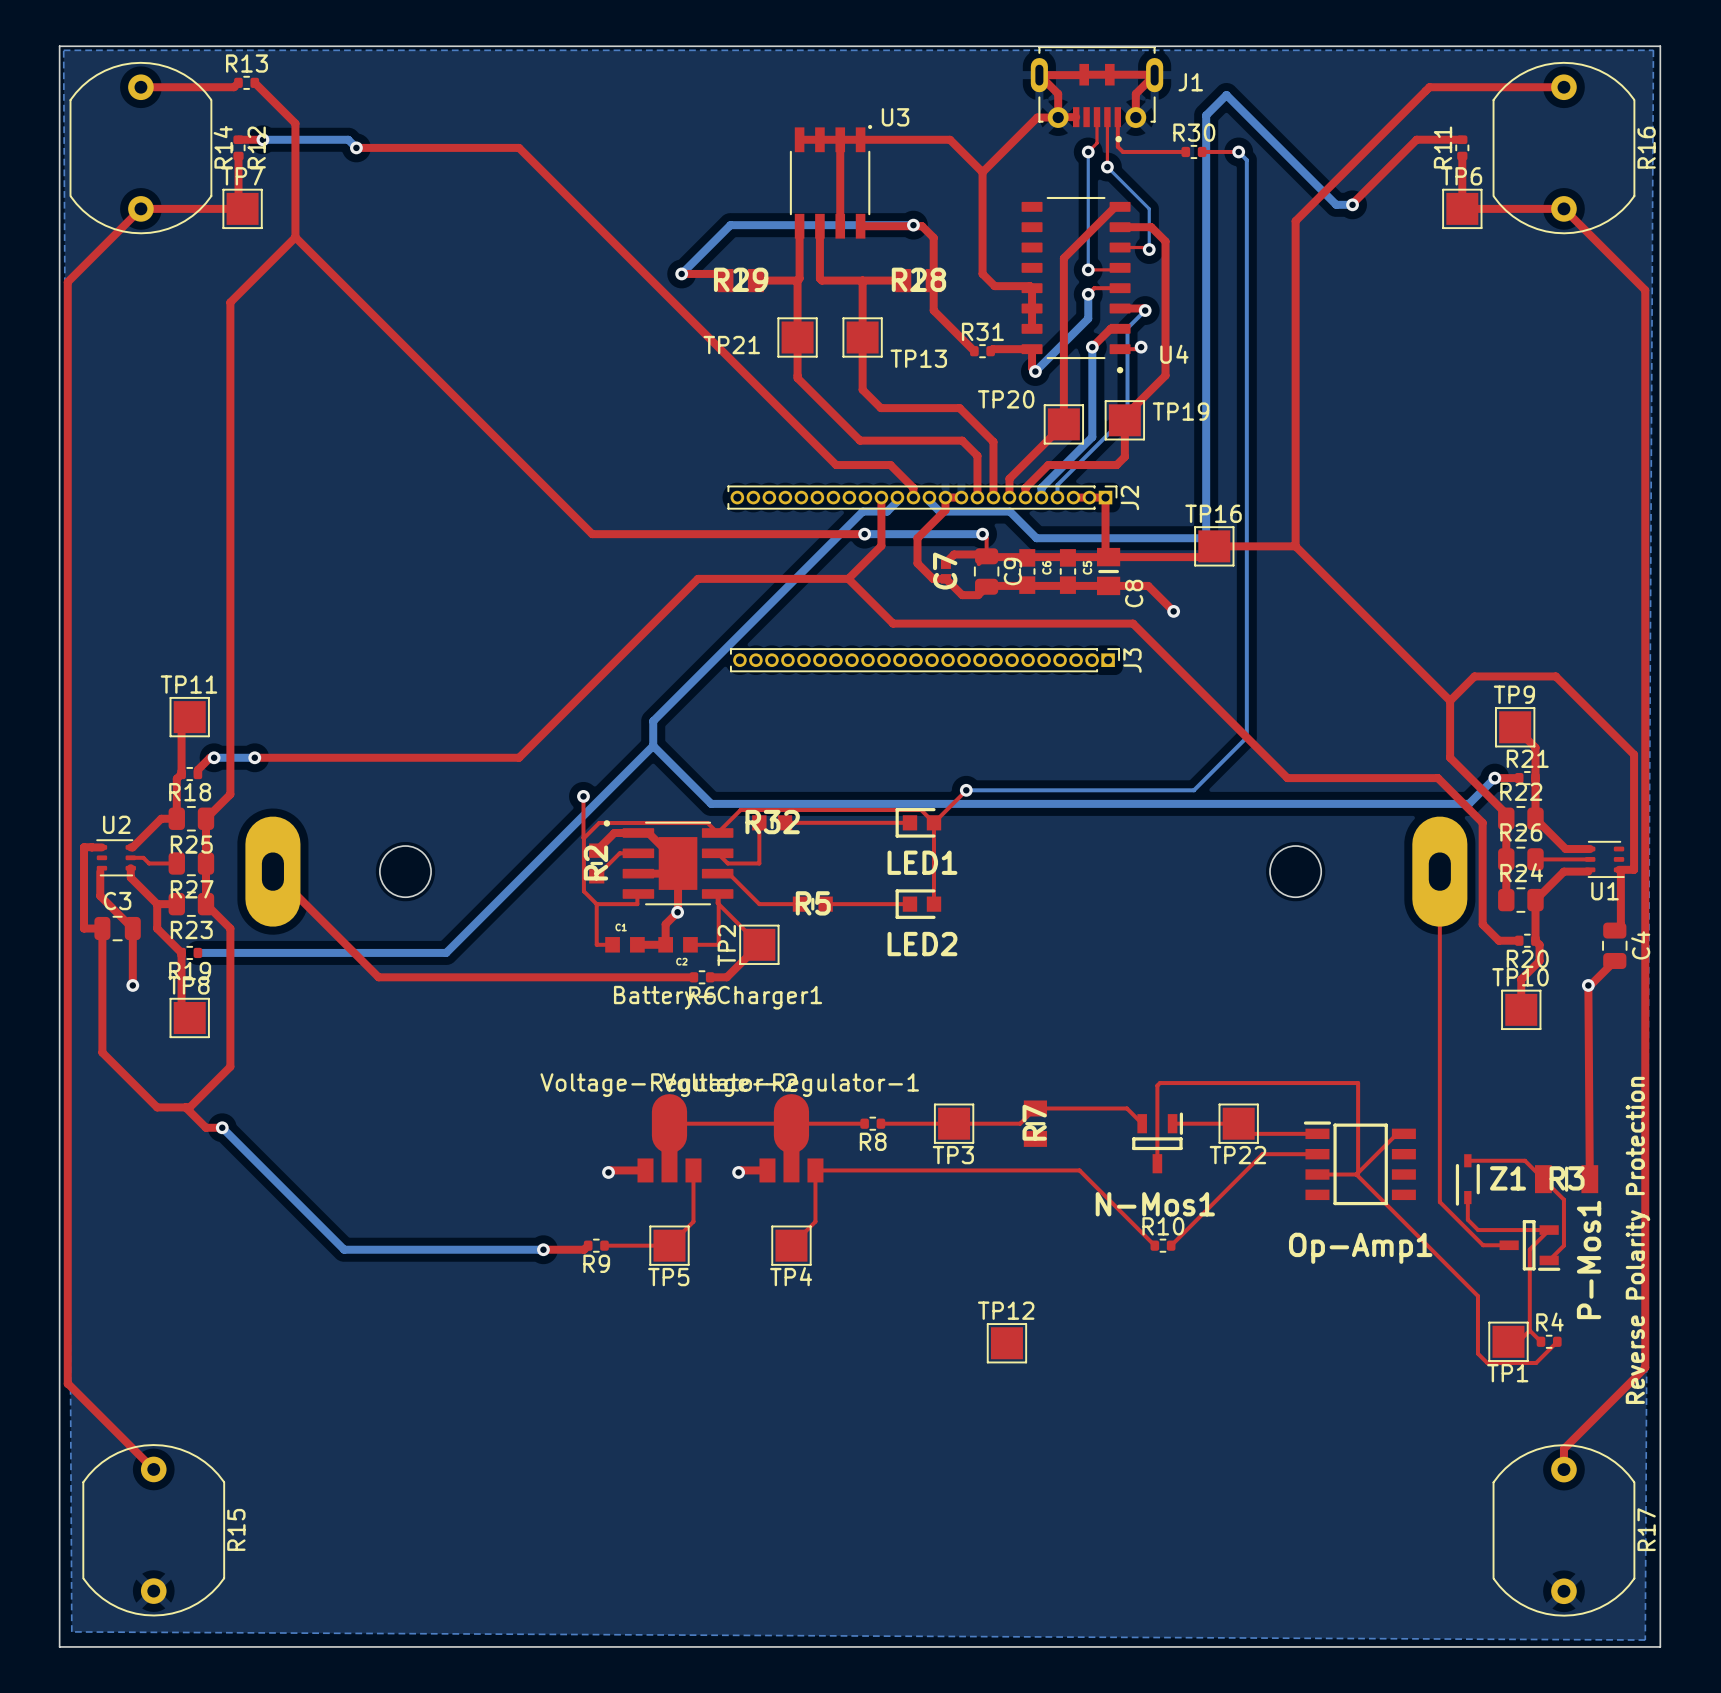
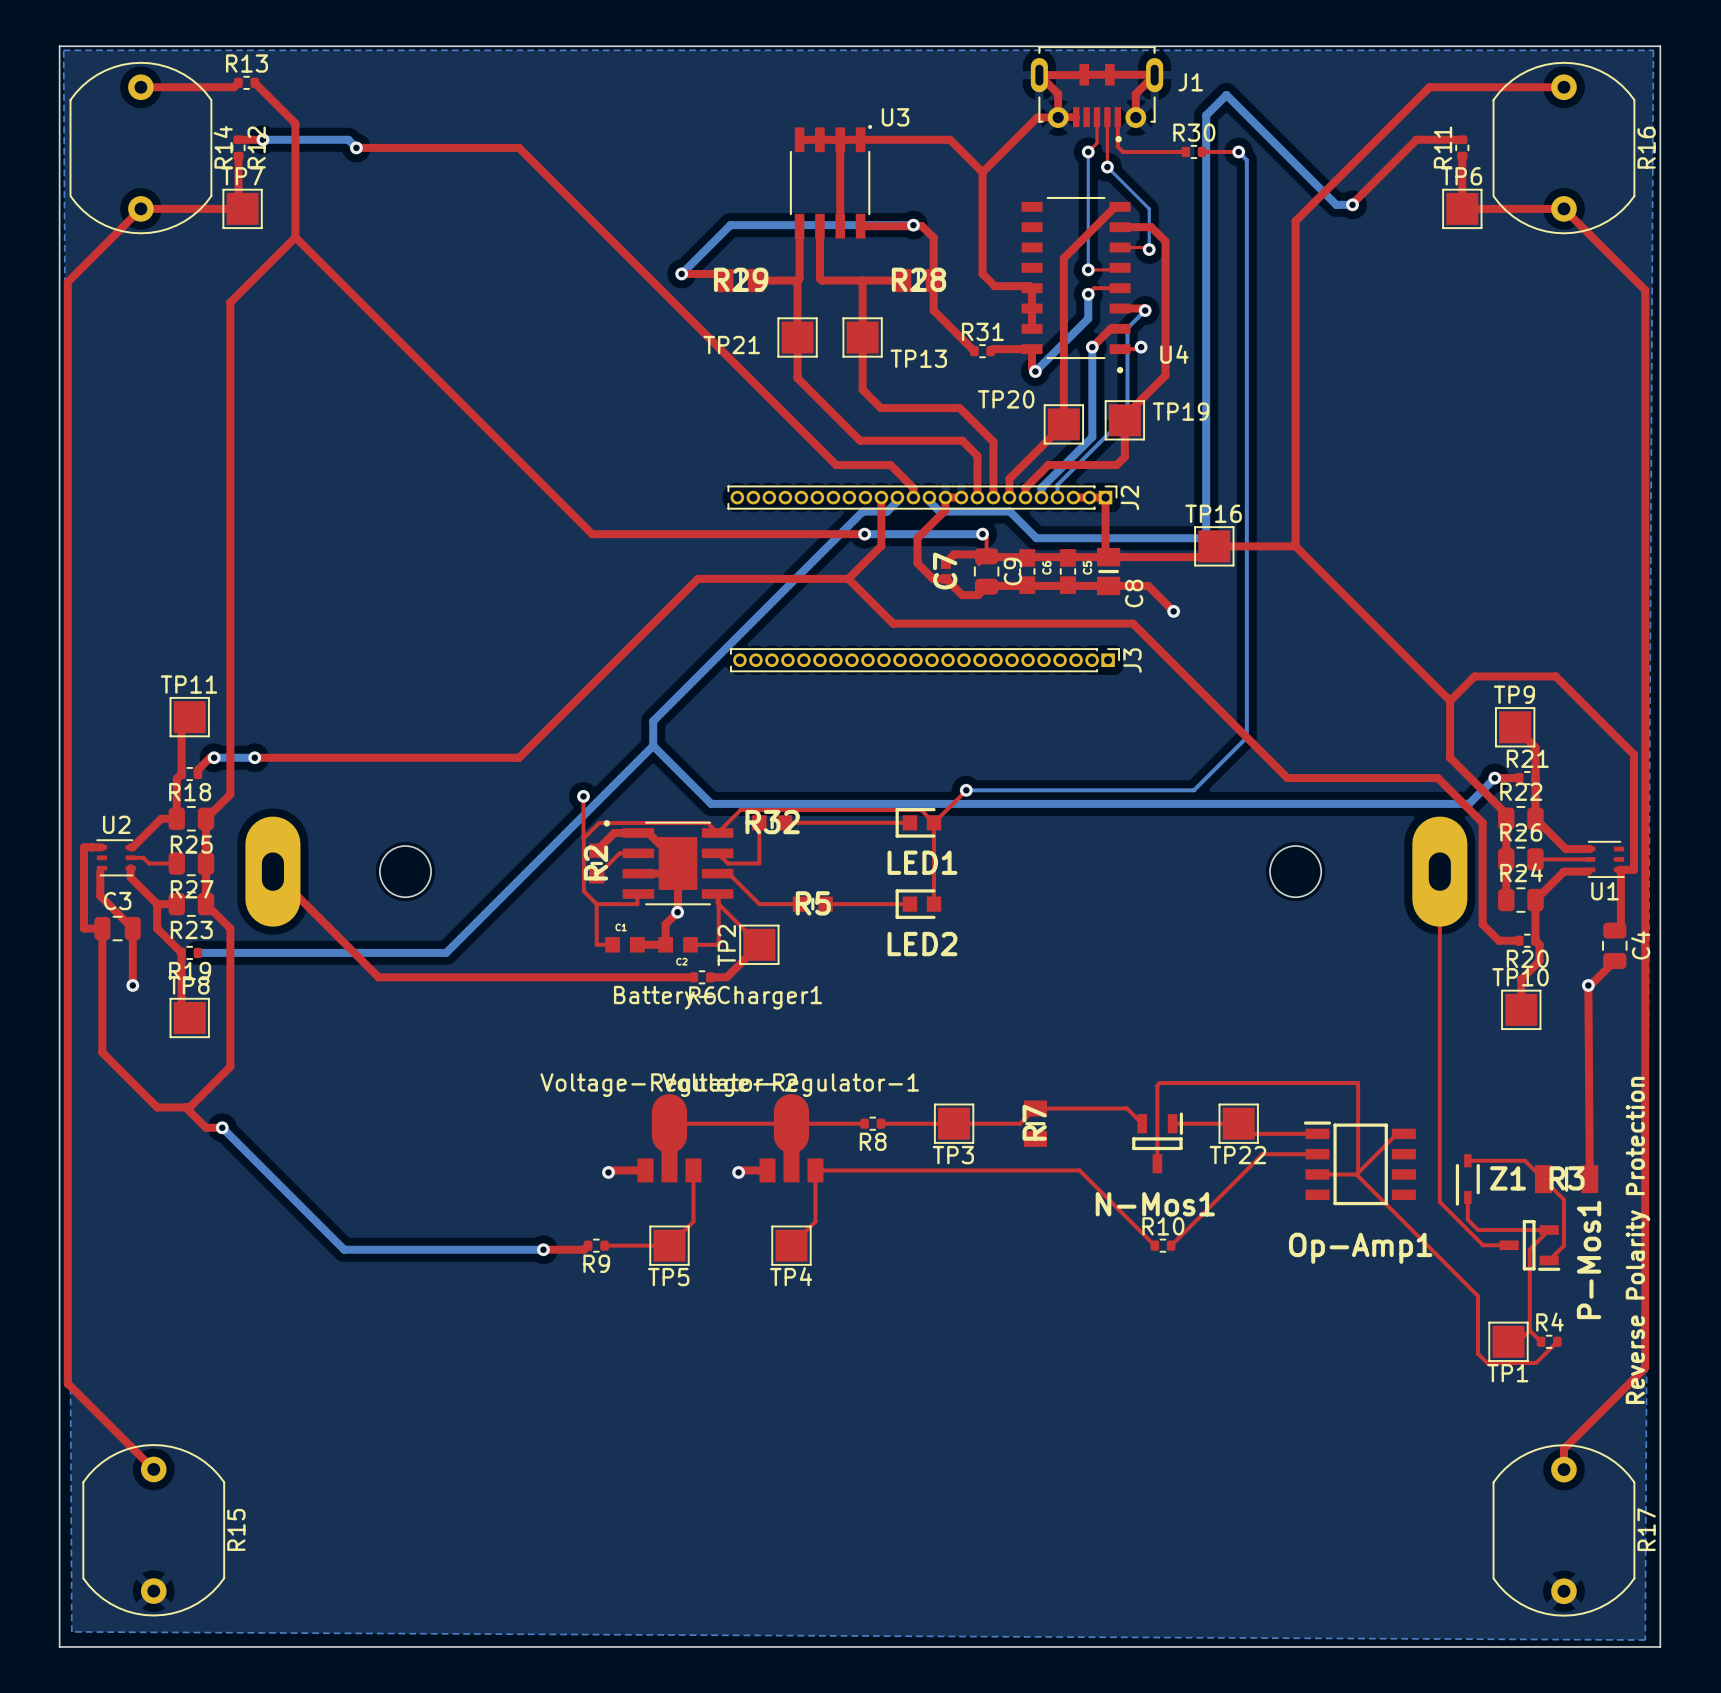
TP12: (1006, 1343) -> none

